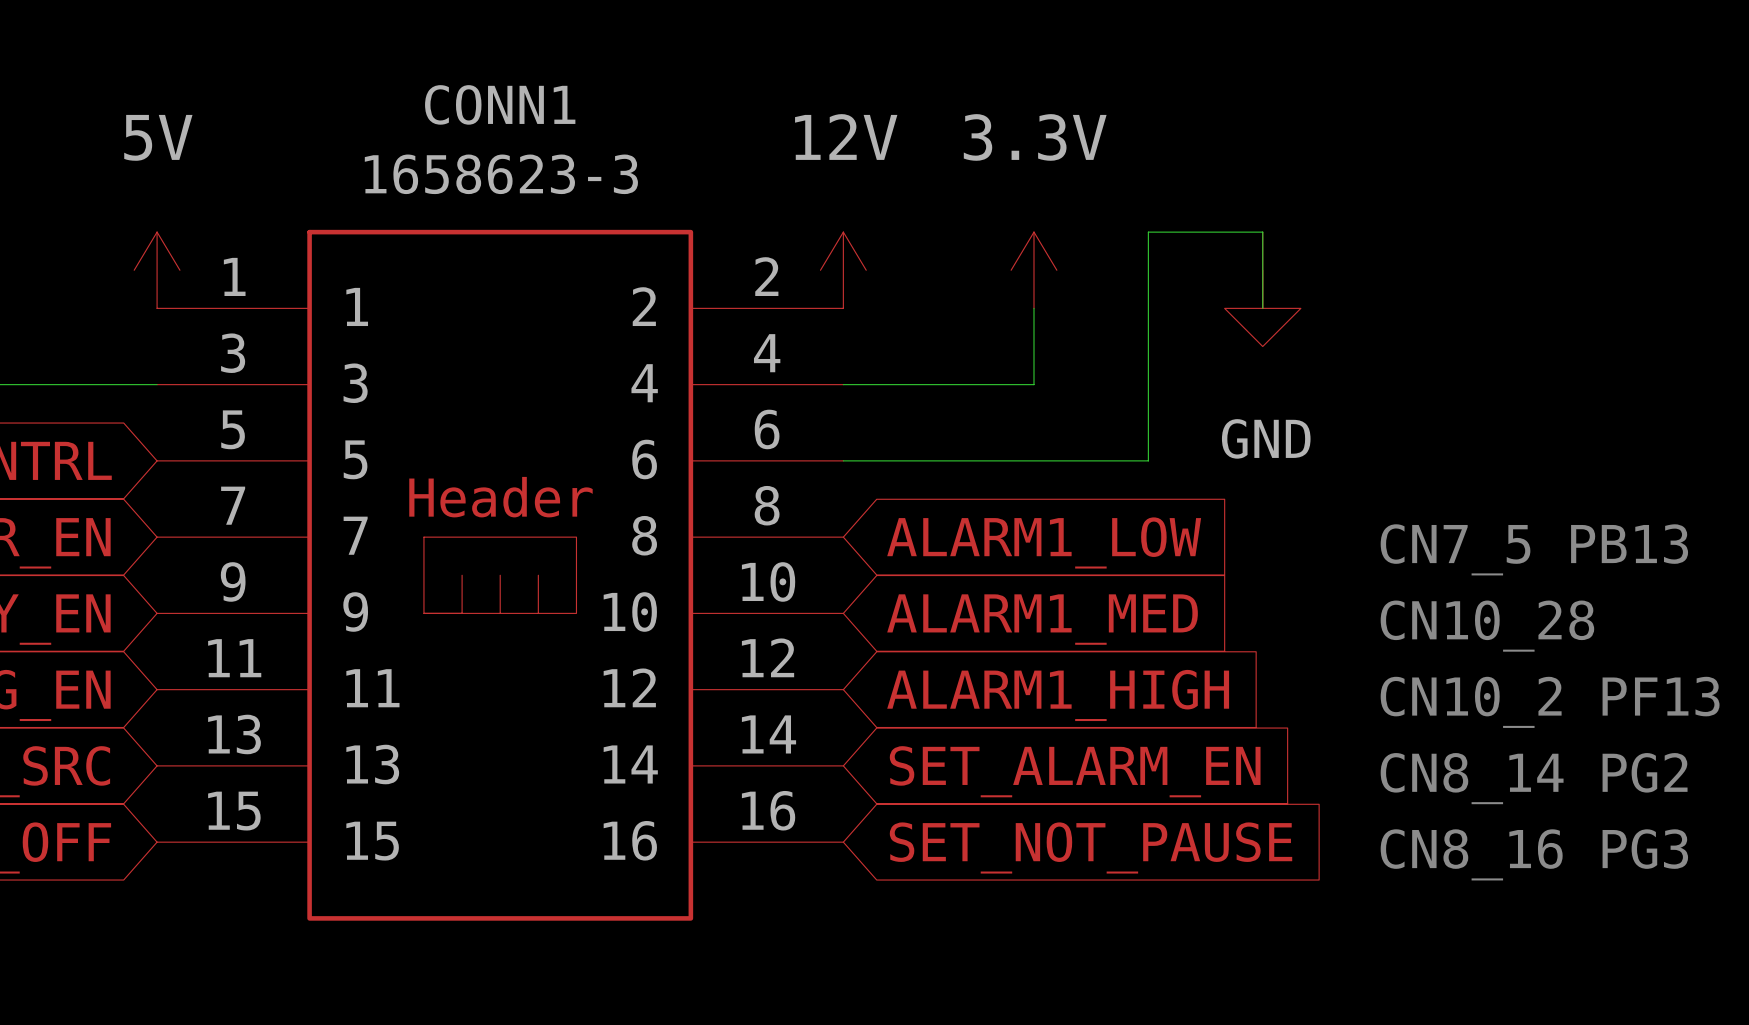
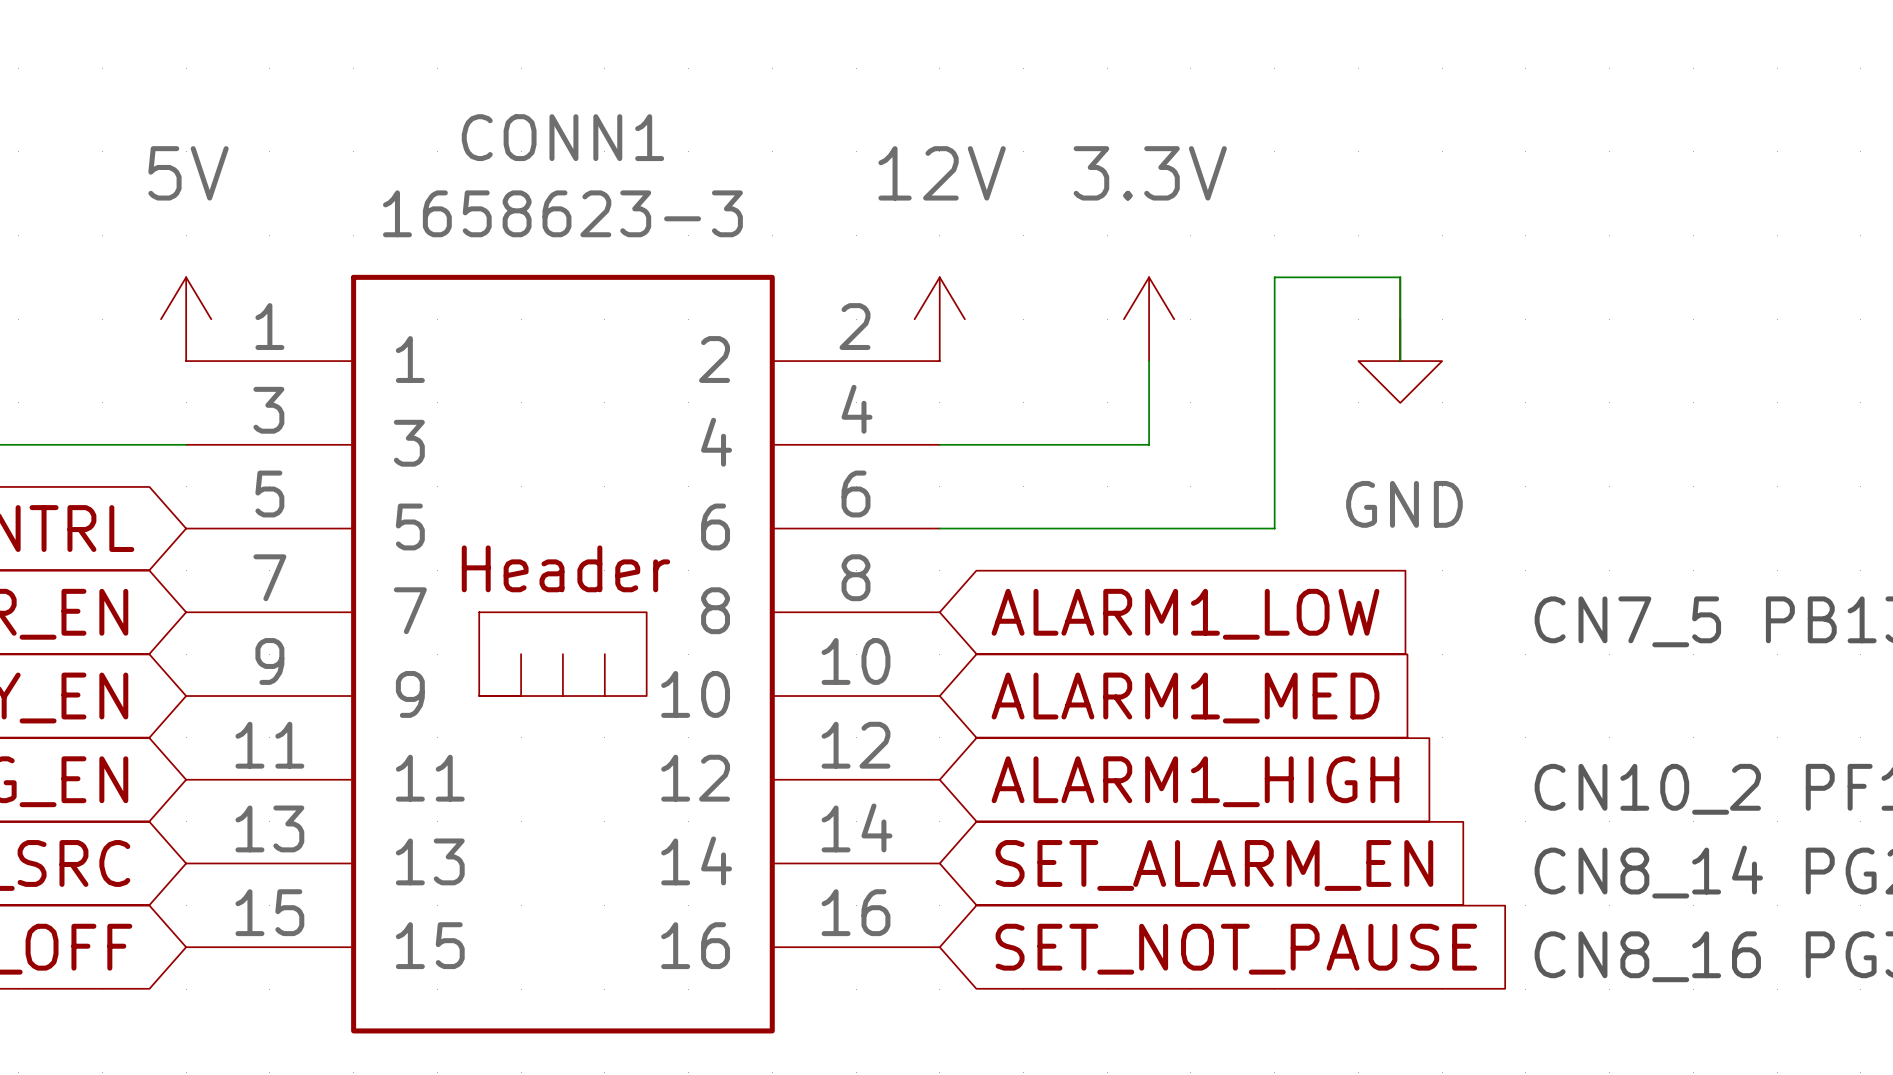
text: CN10_28 (1487, 626) -> none

